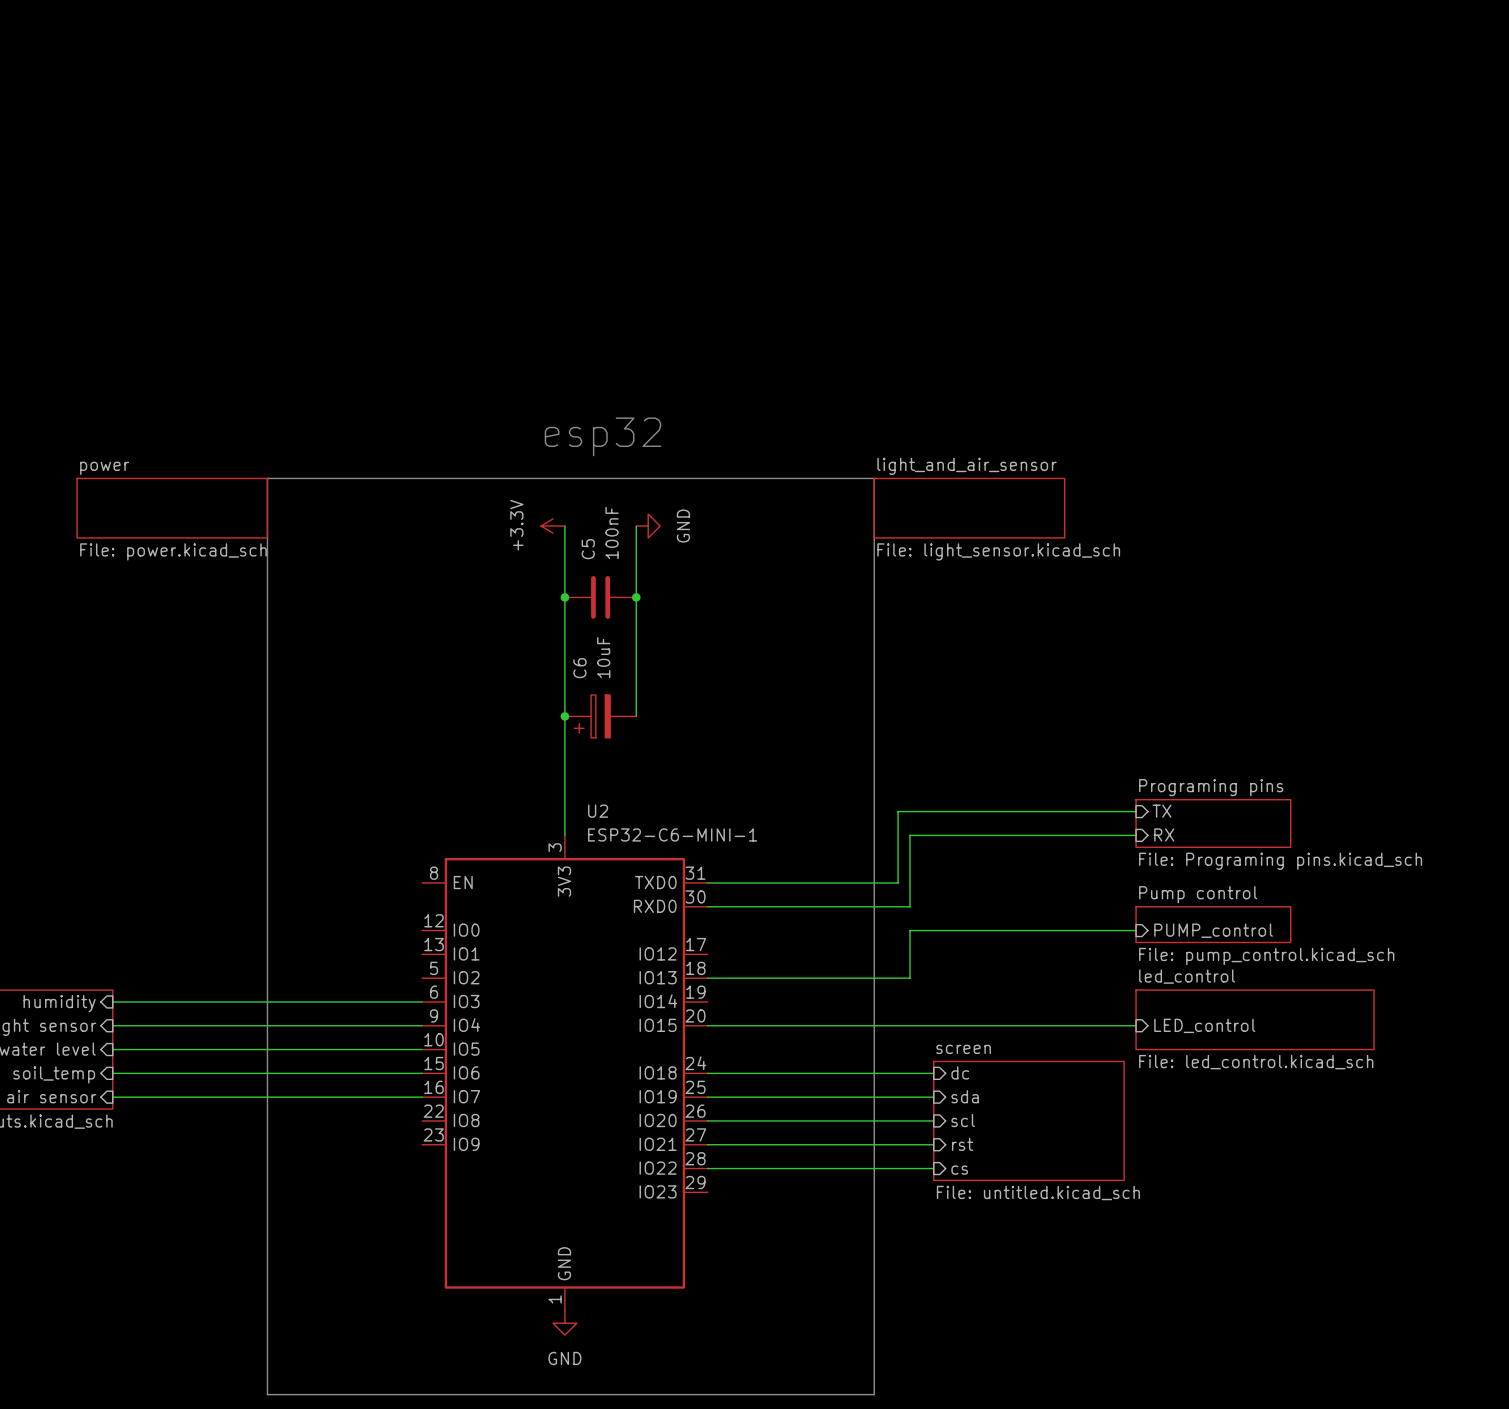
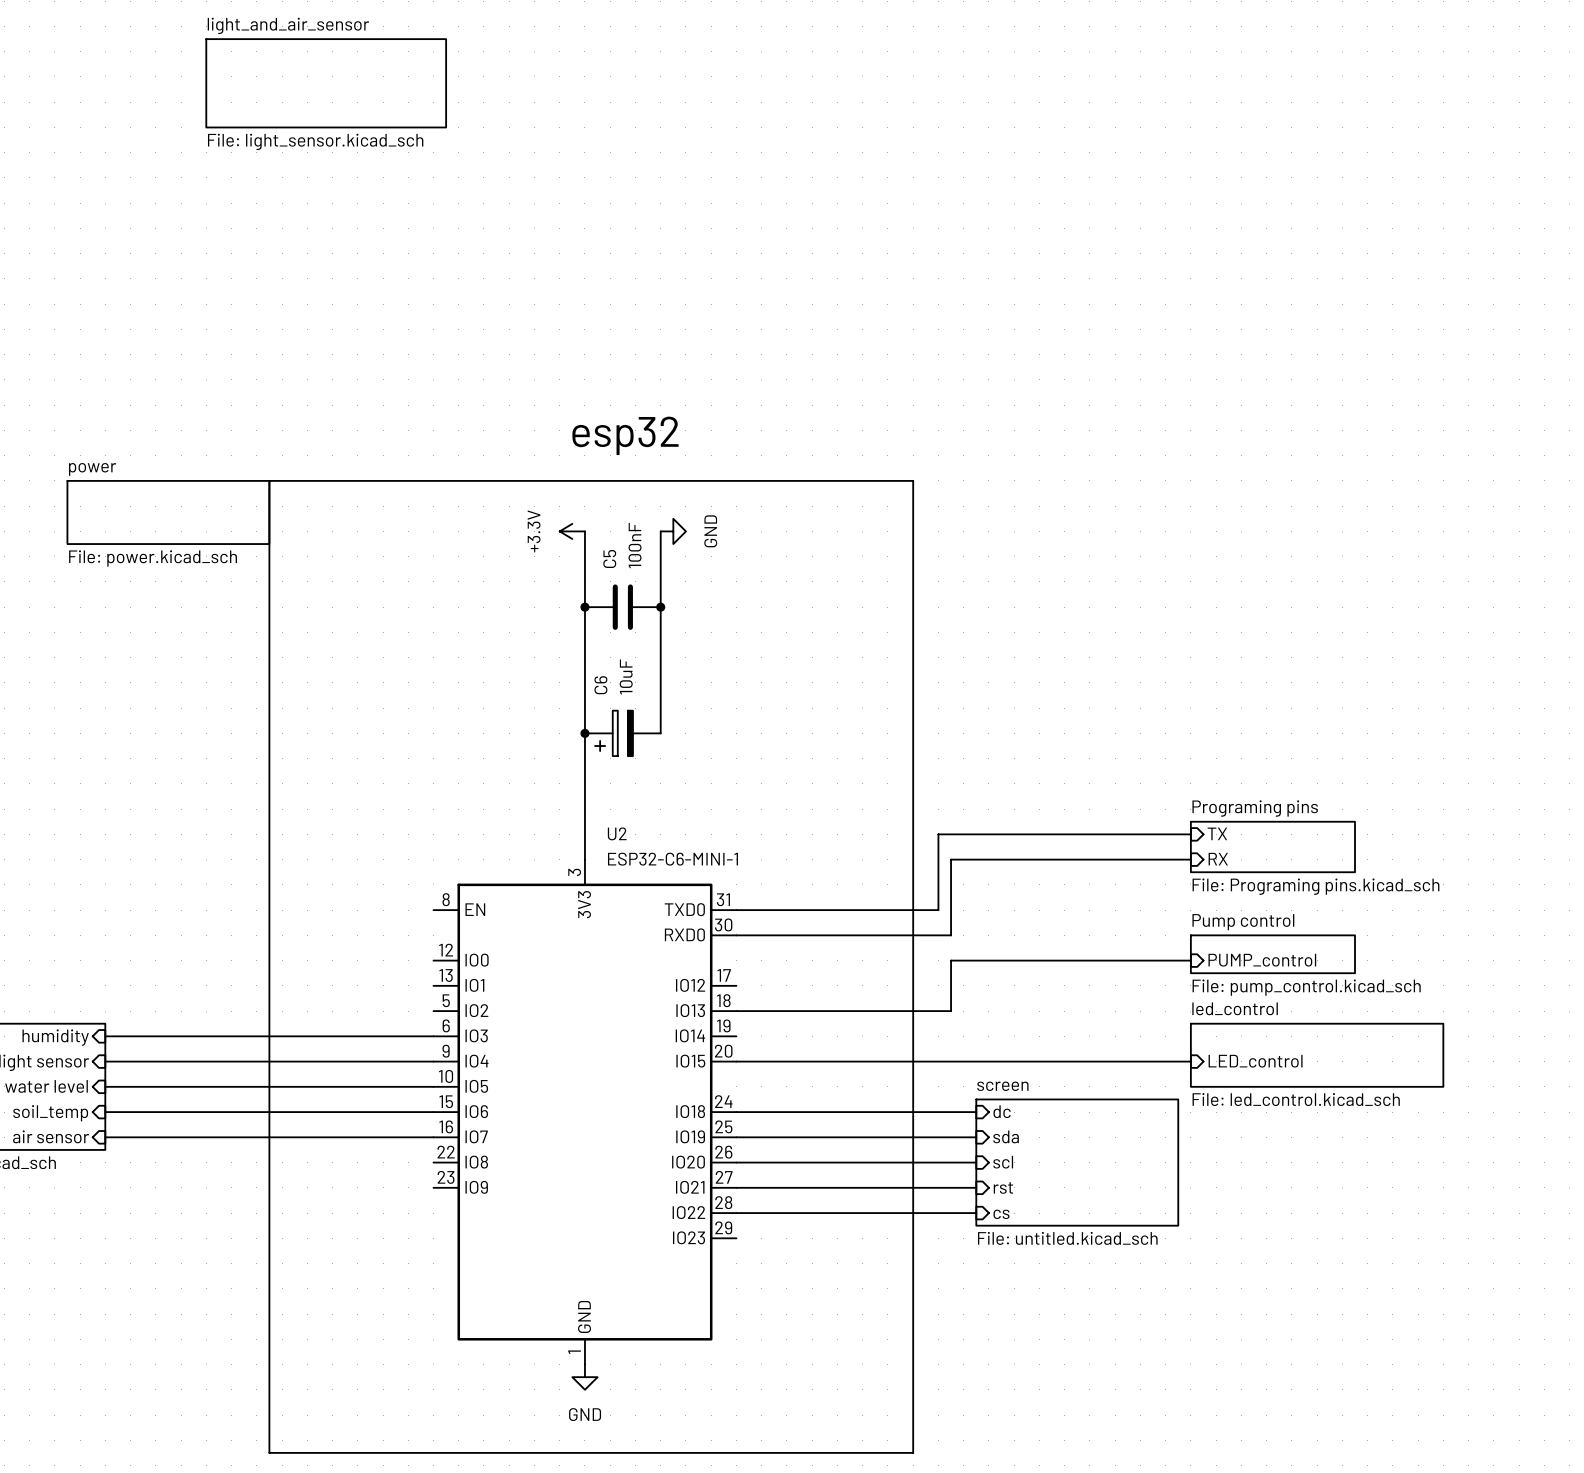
sheet light_and_air_sensor: none -> File: light_sensor.kicad_sch (326, 83)
sheet light_and_air_sensor: File: light_sensor.kicad_sch (969, 508) -> none

